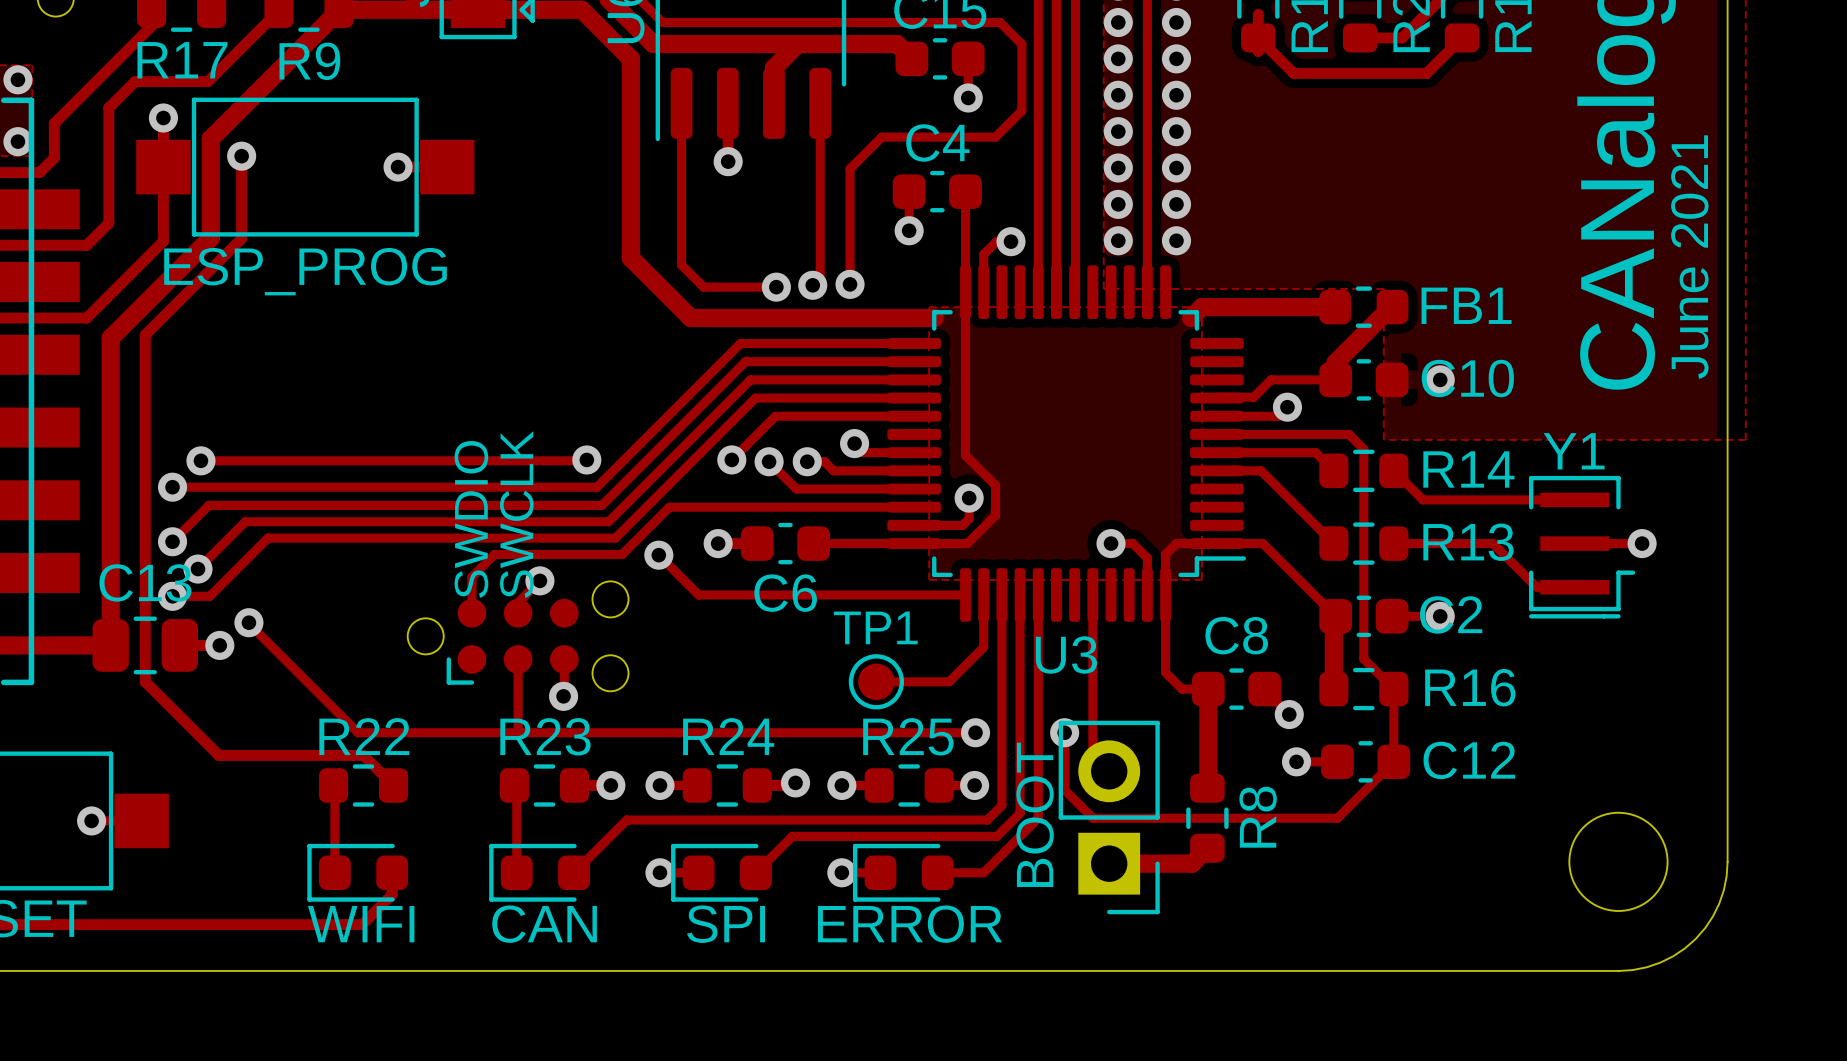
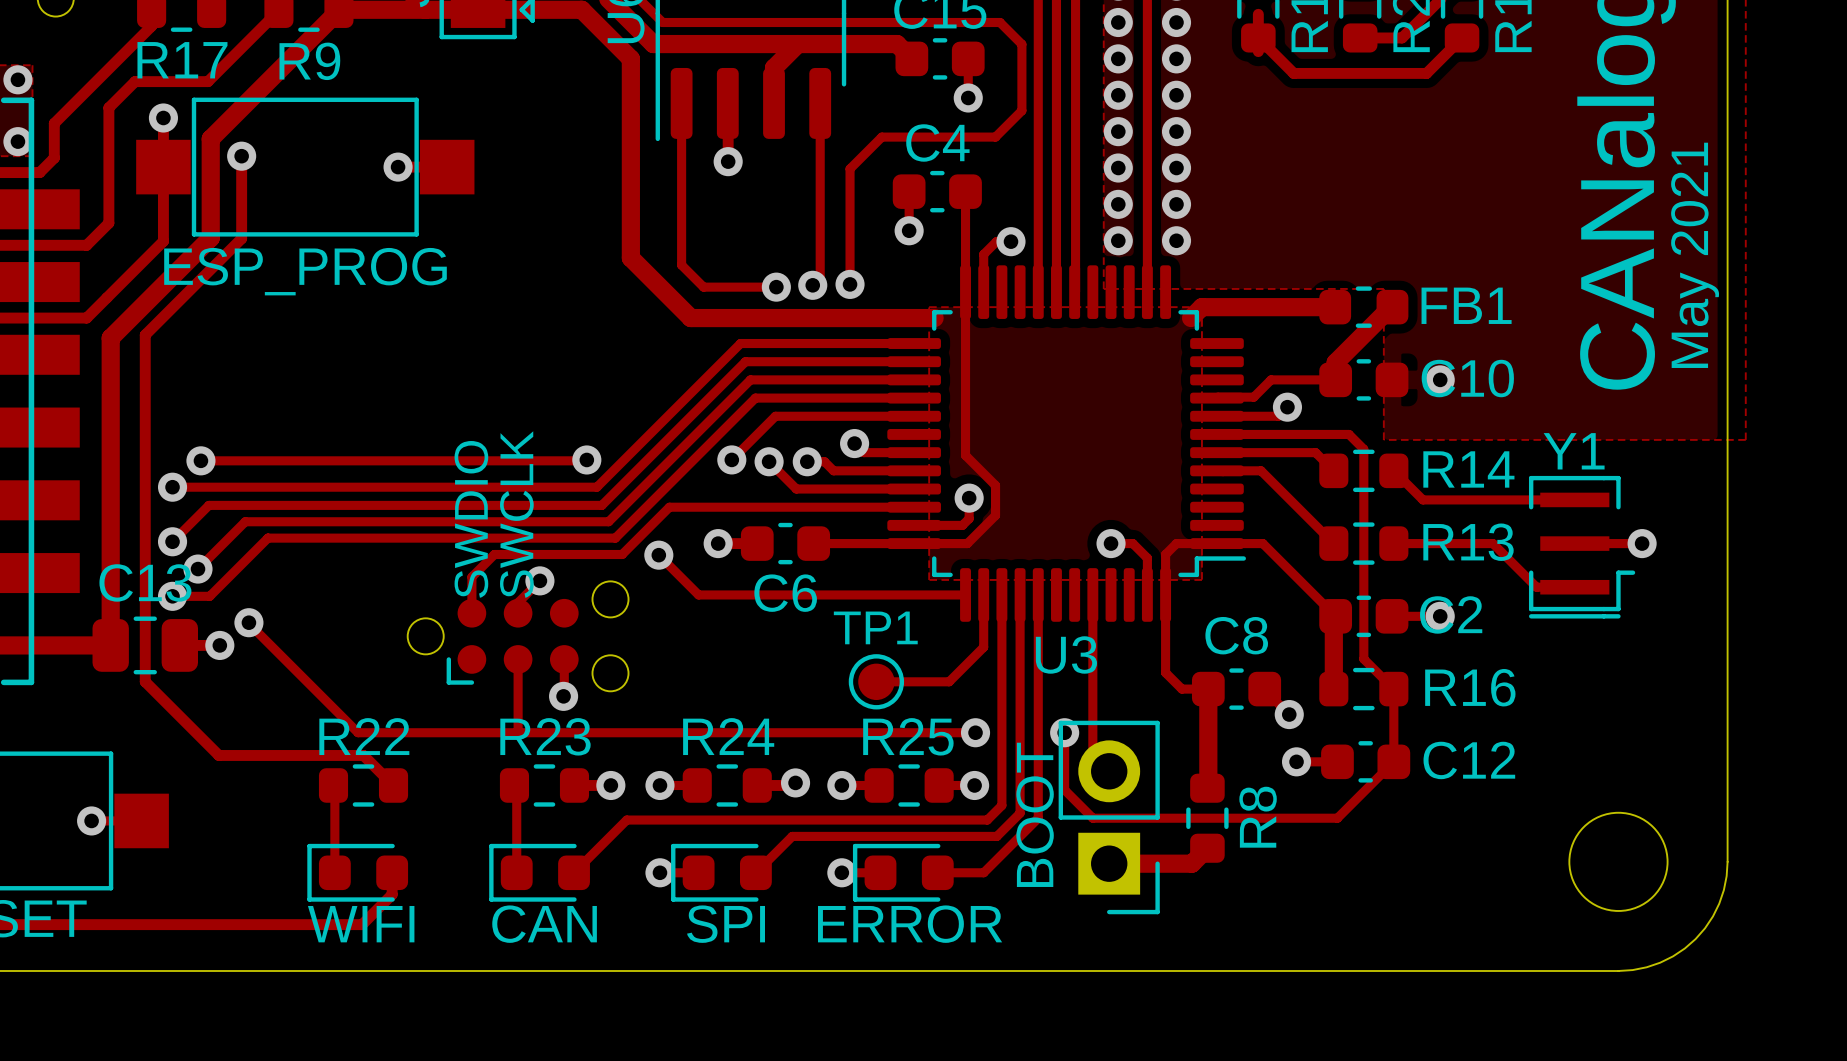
text: June 2021 (1689, 257) -> May 2021 (1695, 255)

